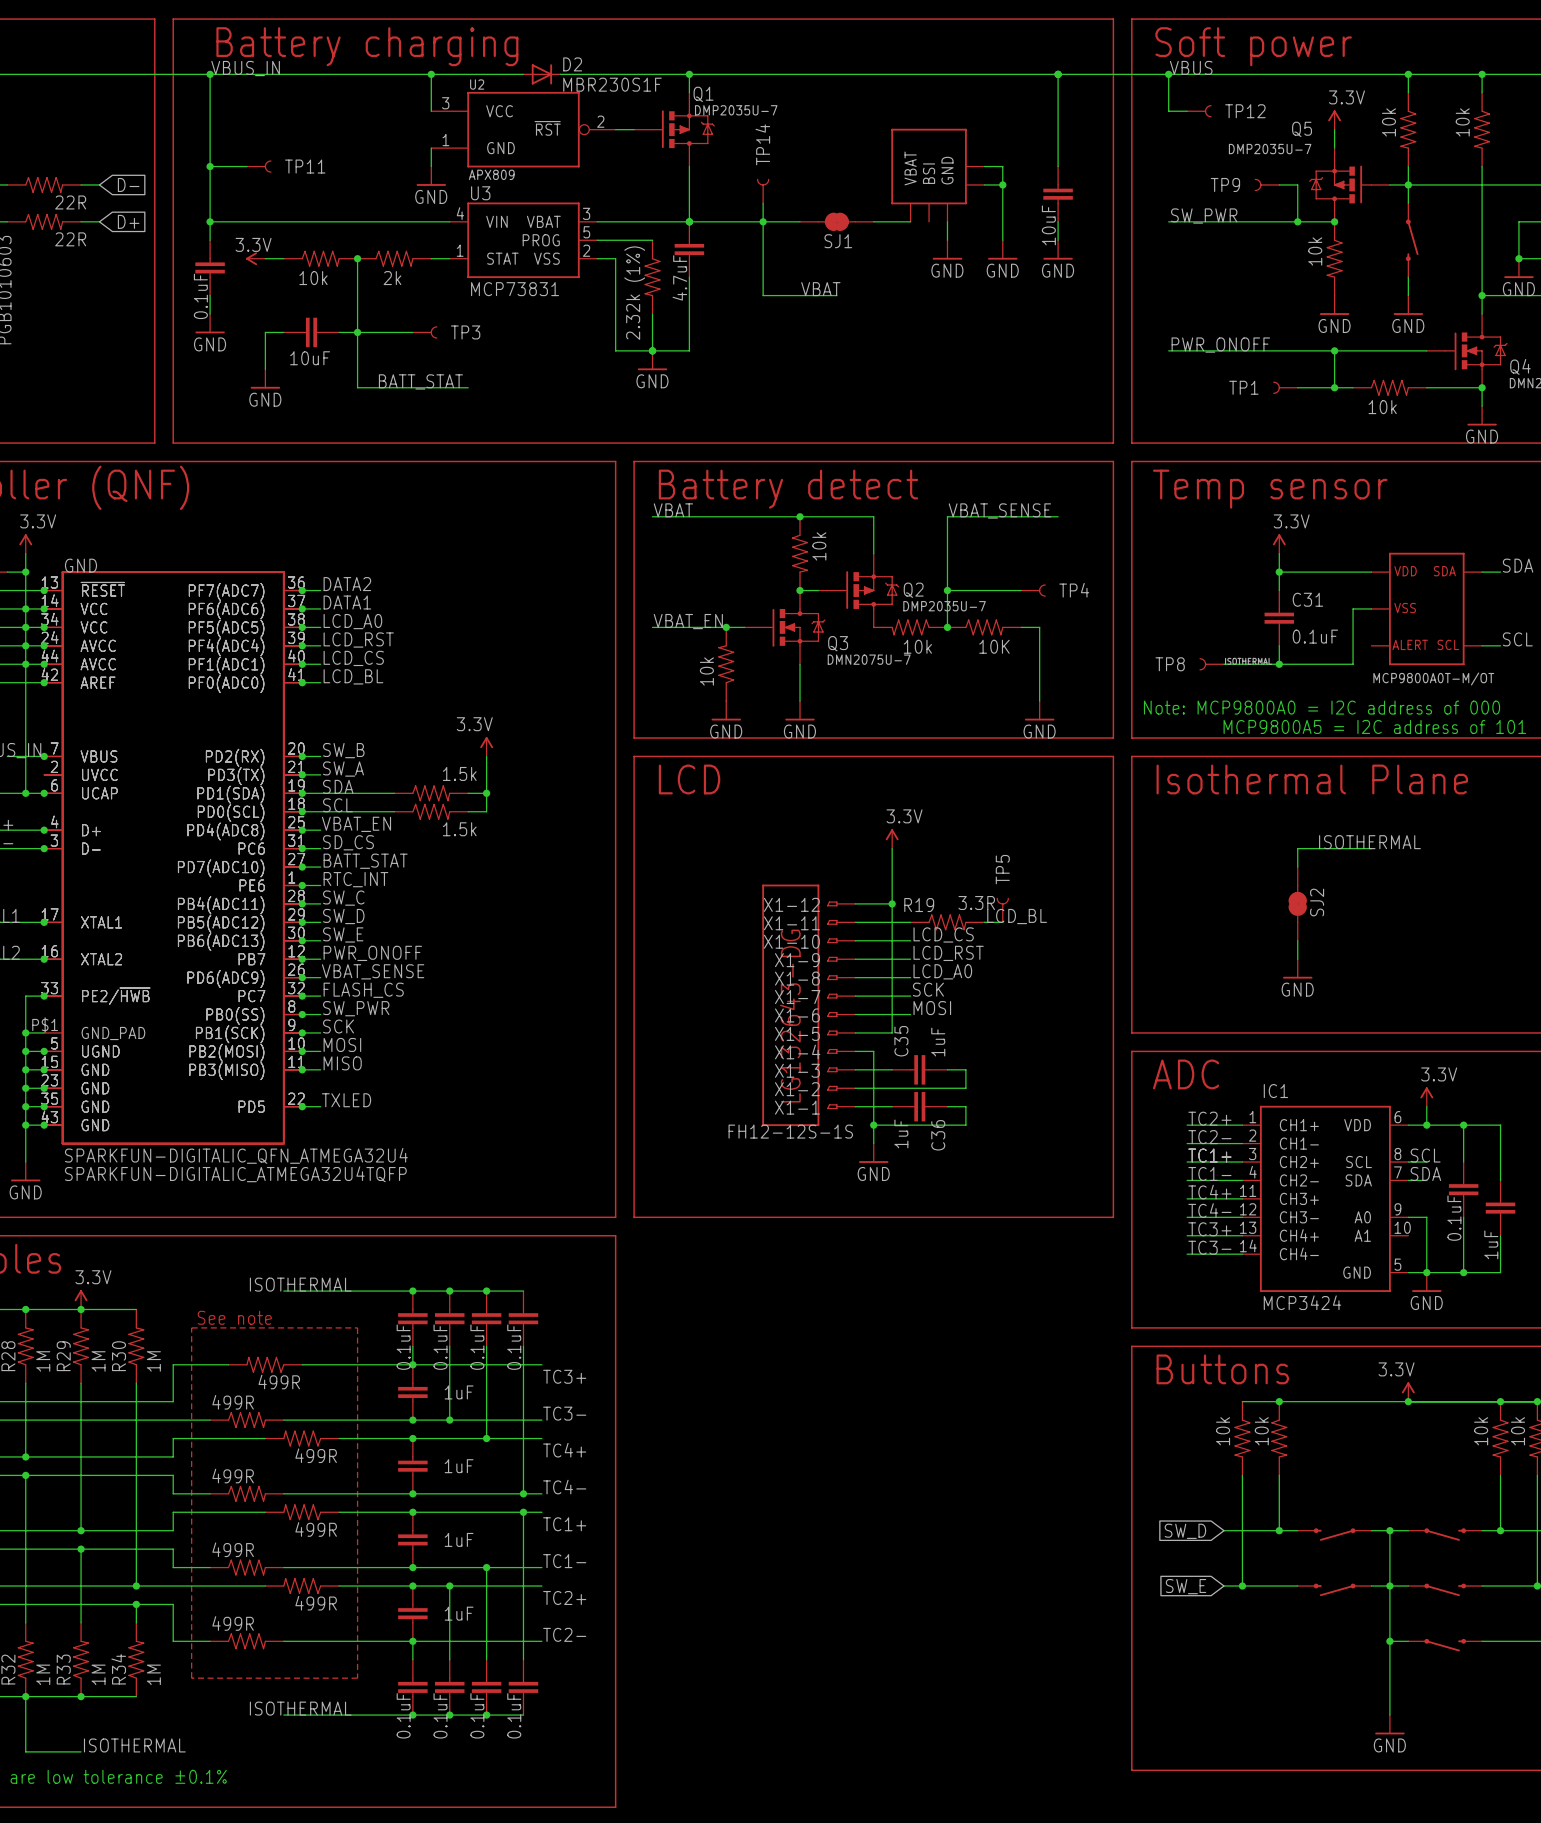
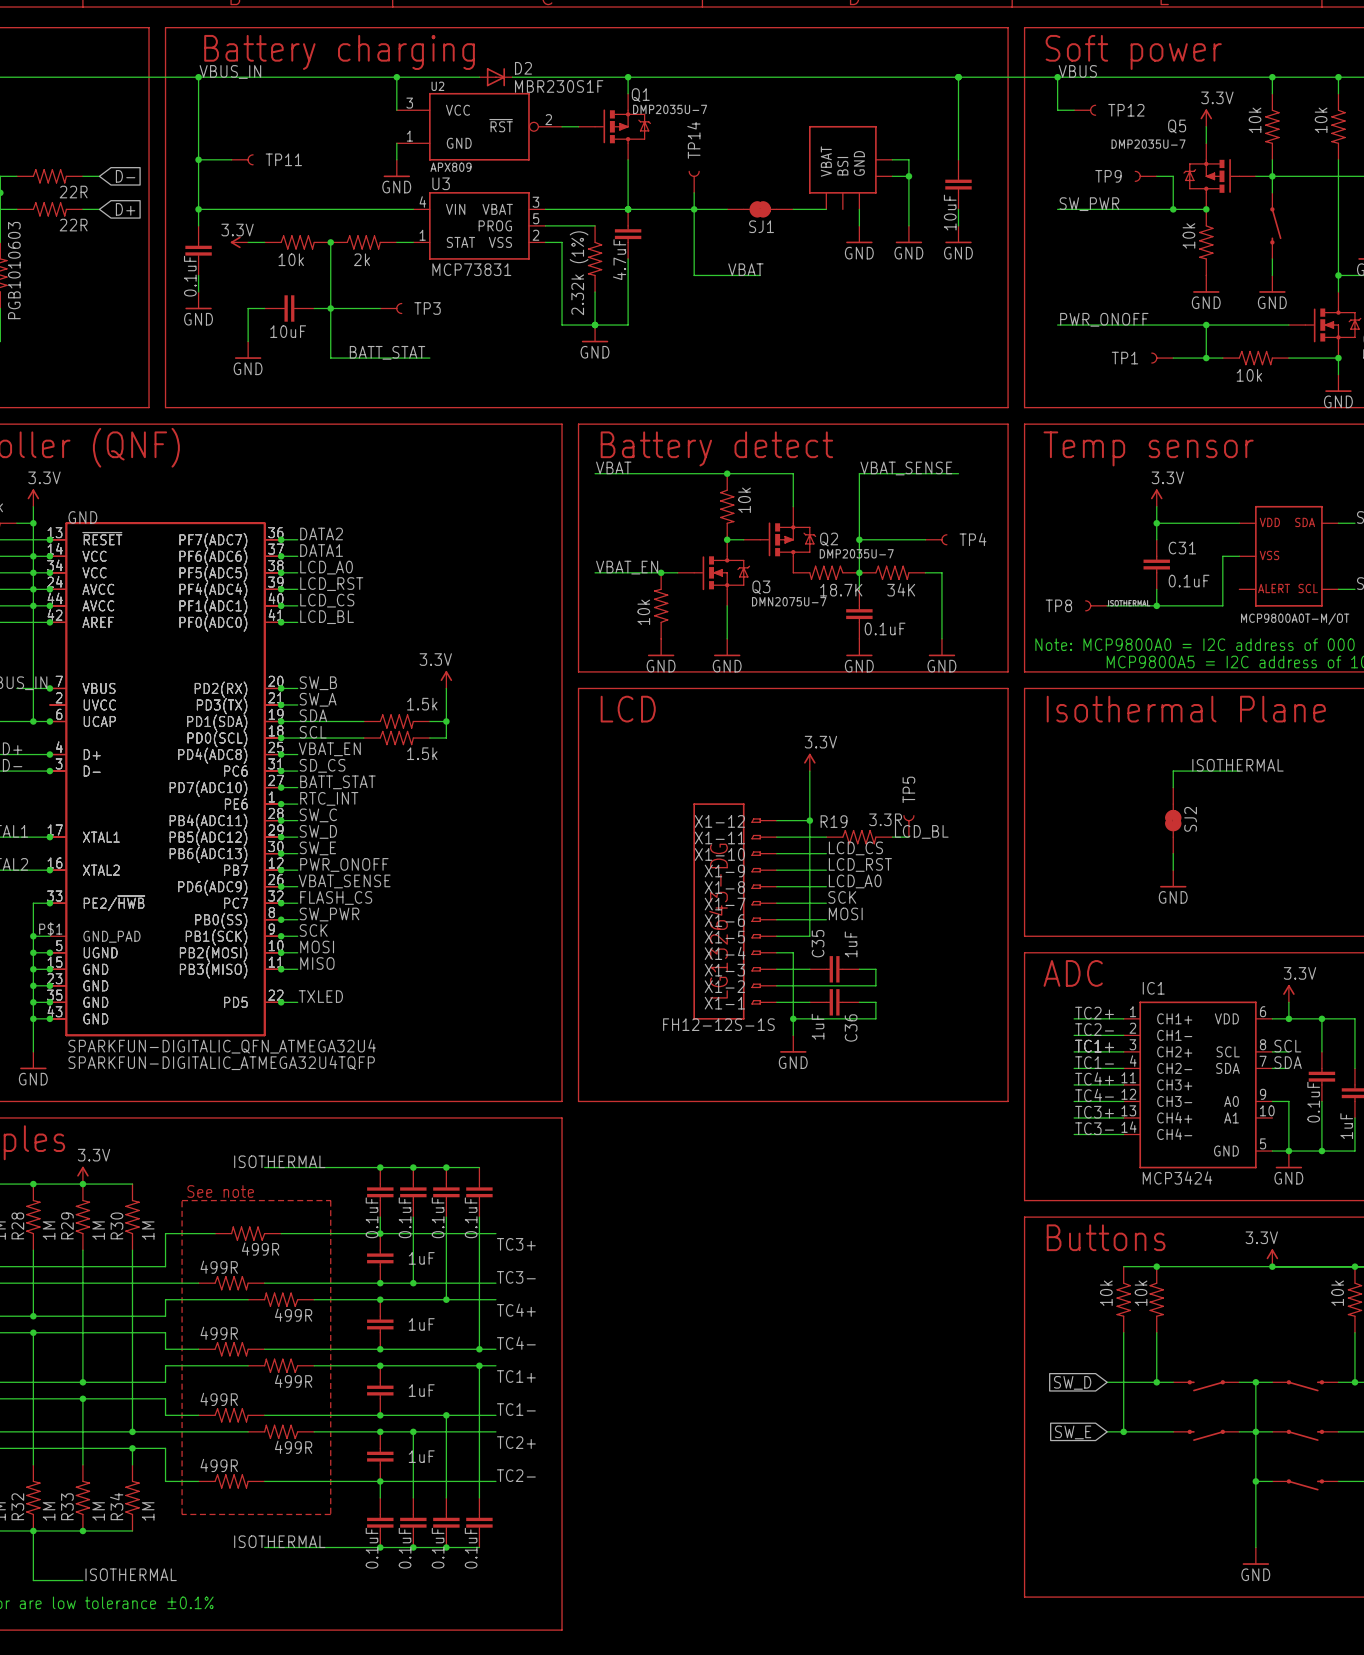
wire: none -> (859, 572) (859, 589)
part value: 10k (917, 646) -> 18.7K (841, 590)
part value: 10K (994, 646) -> 34K (901, 589)
part: none -> 0.1uF (859, 614)
power symbol: none -> GND (859, 647)

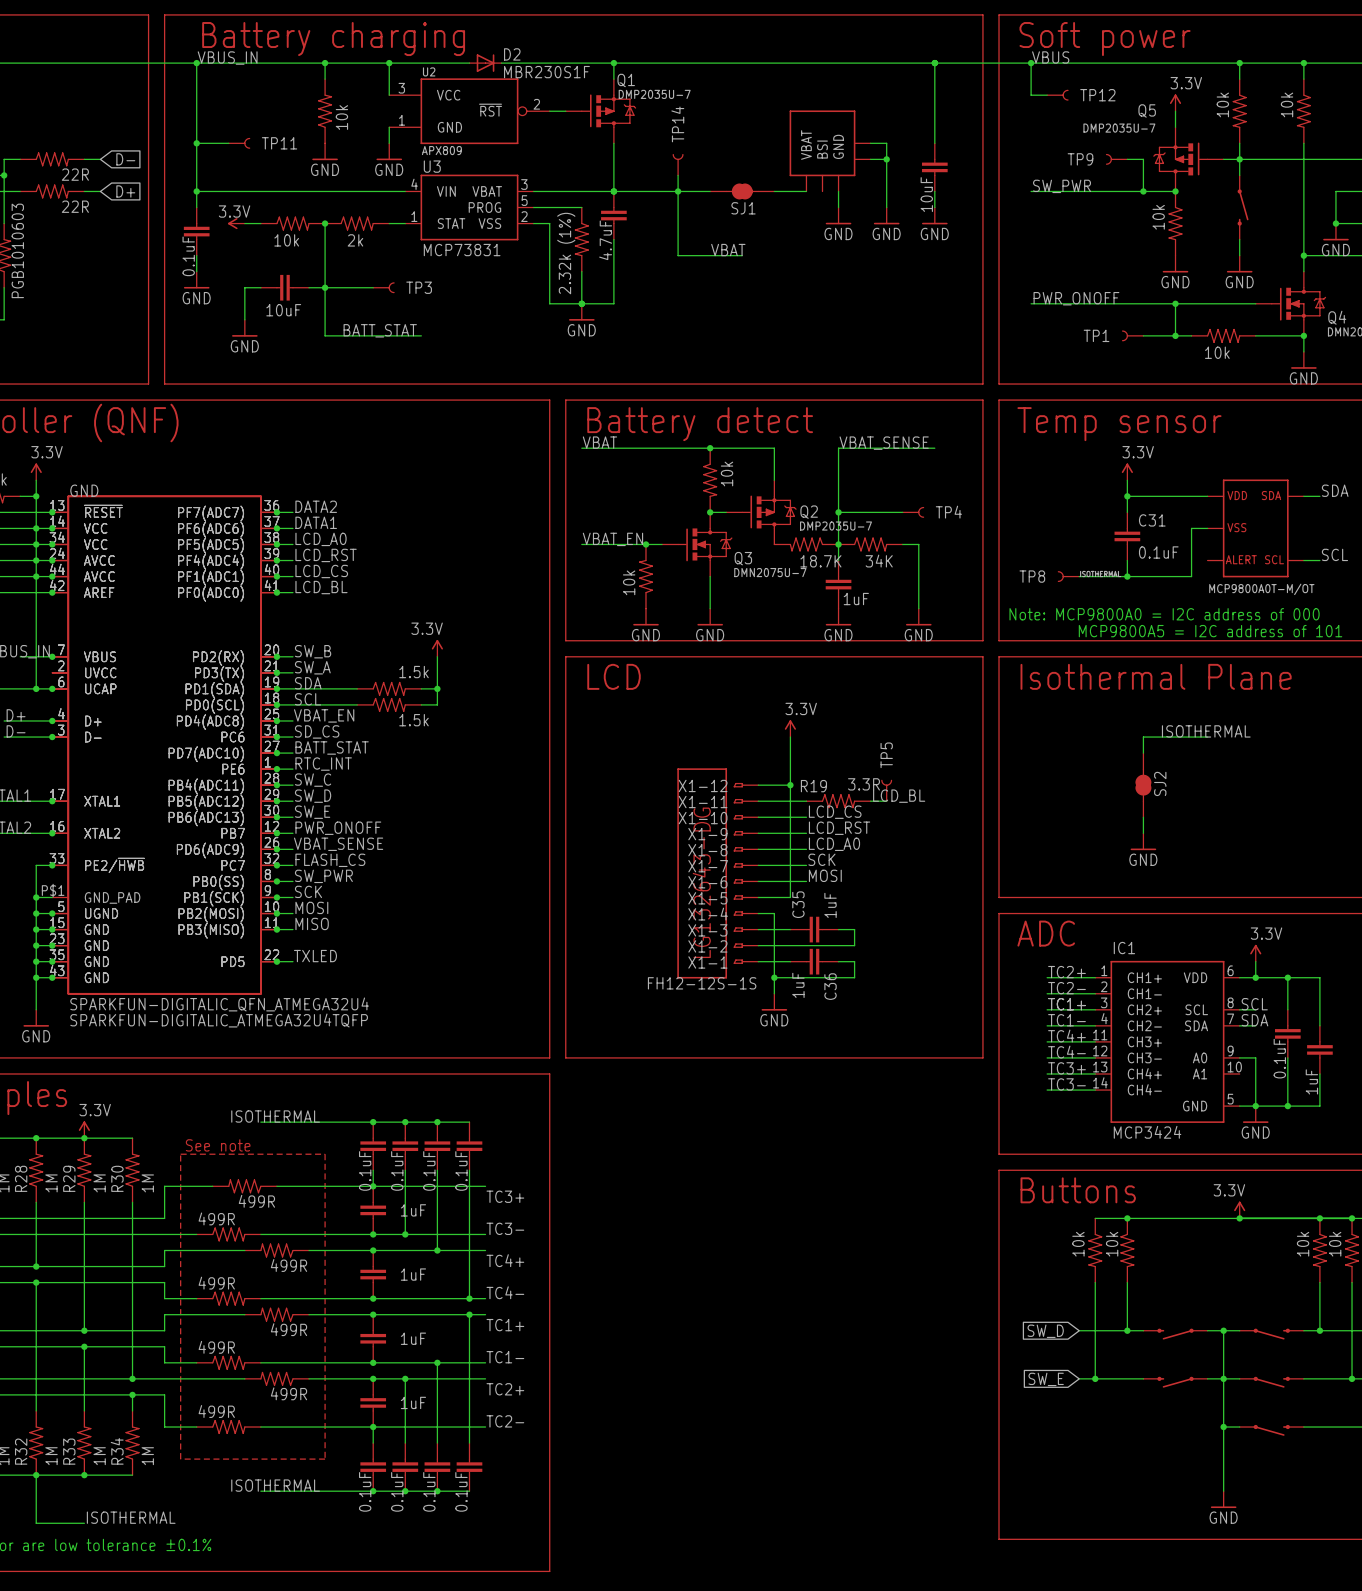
wire: none -> (325, 63) (325, 79)
junction: none -> (325, 63)
part: none -> 10k (325, 111)
power symbol: none -> GND (325, 151)
part value: 0.1uF (885, 628) -> 1uF (856, 599)

